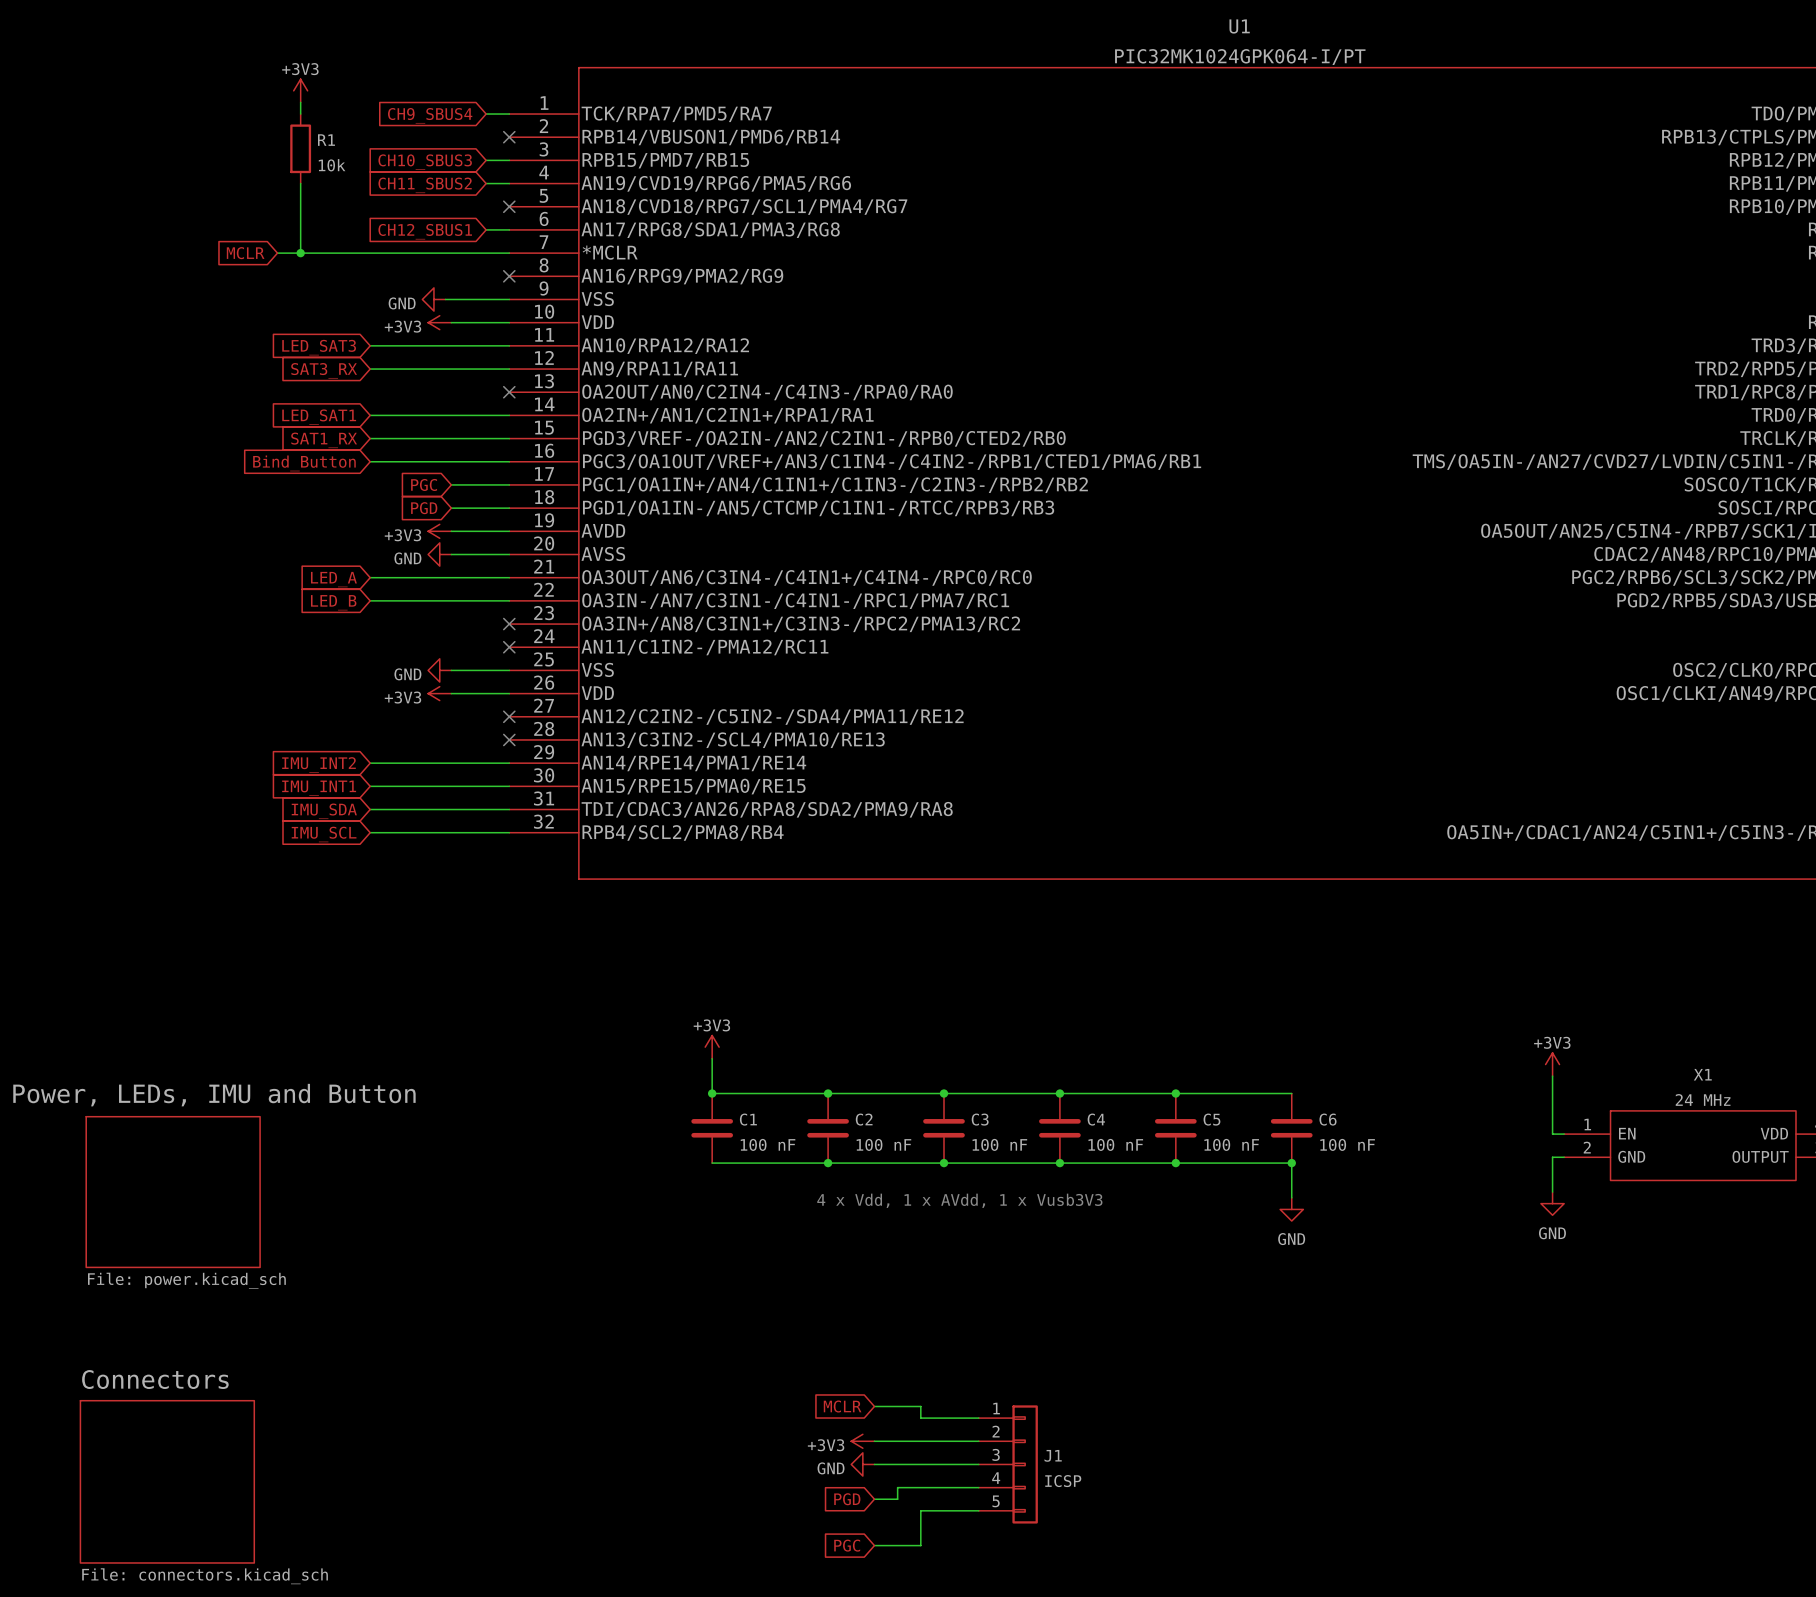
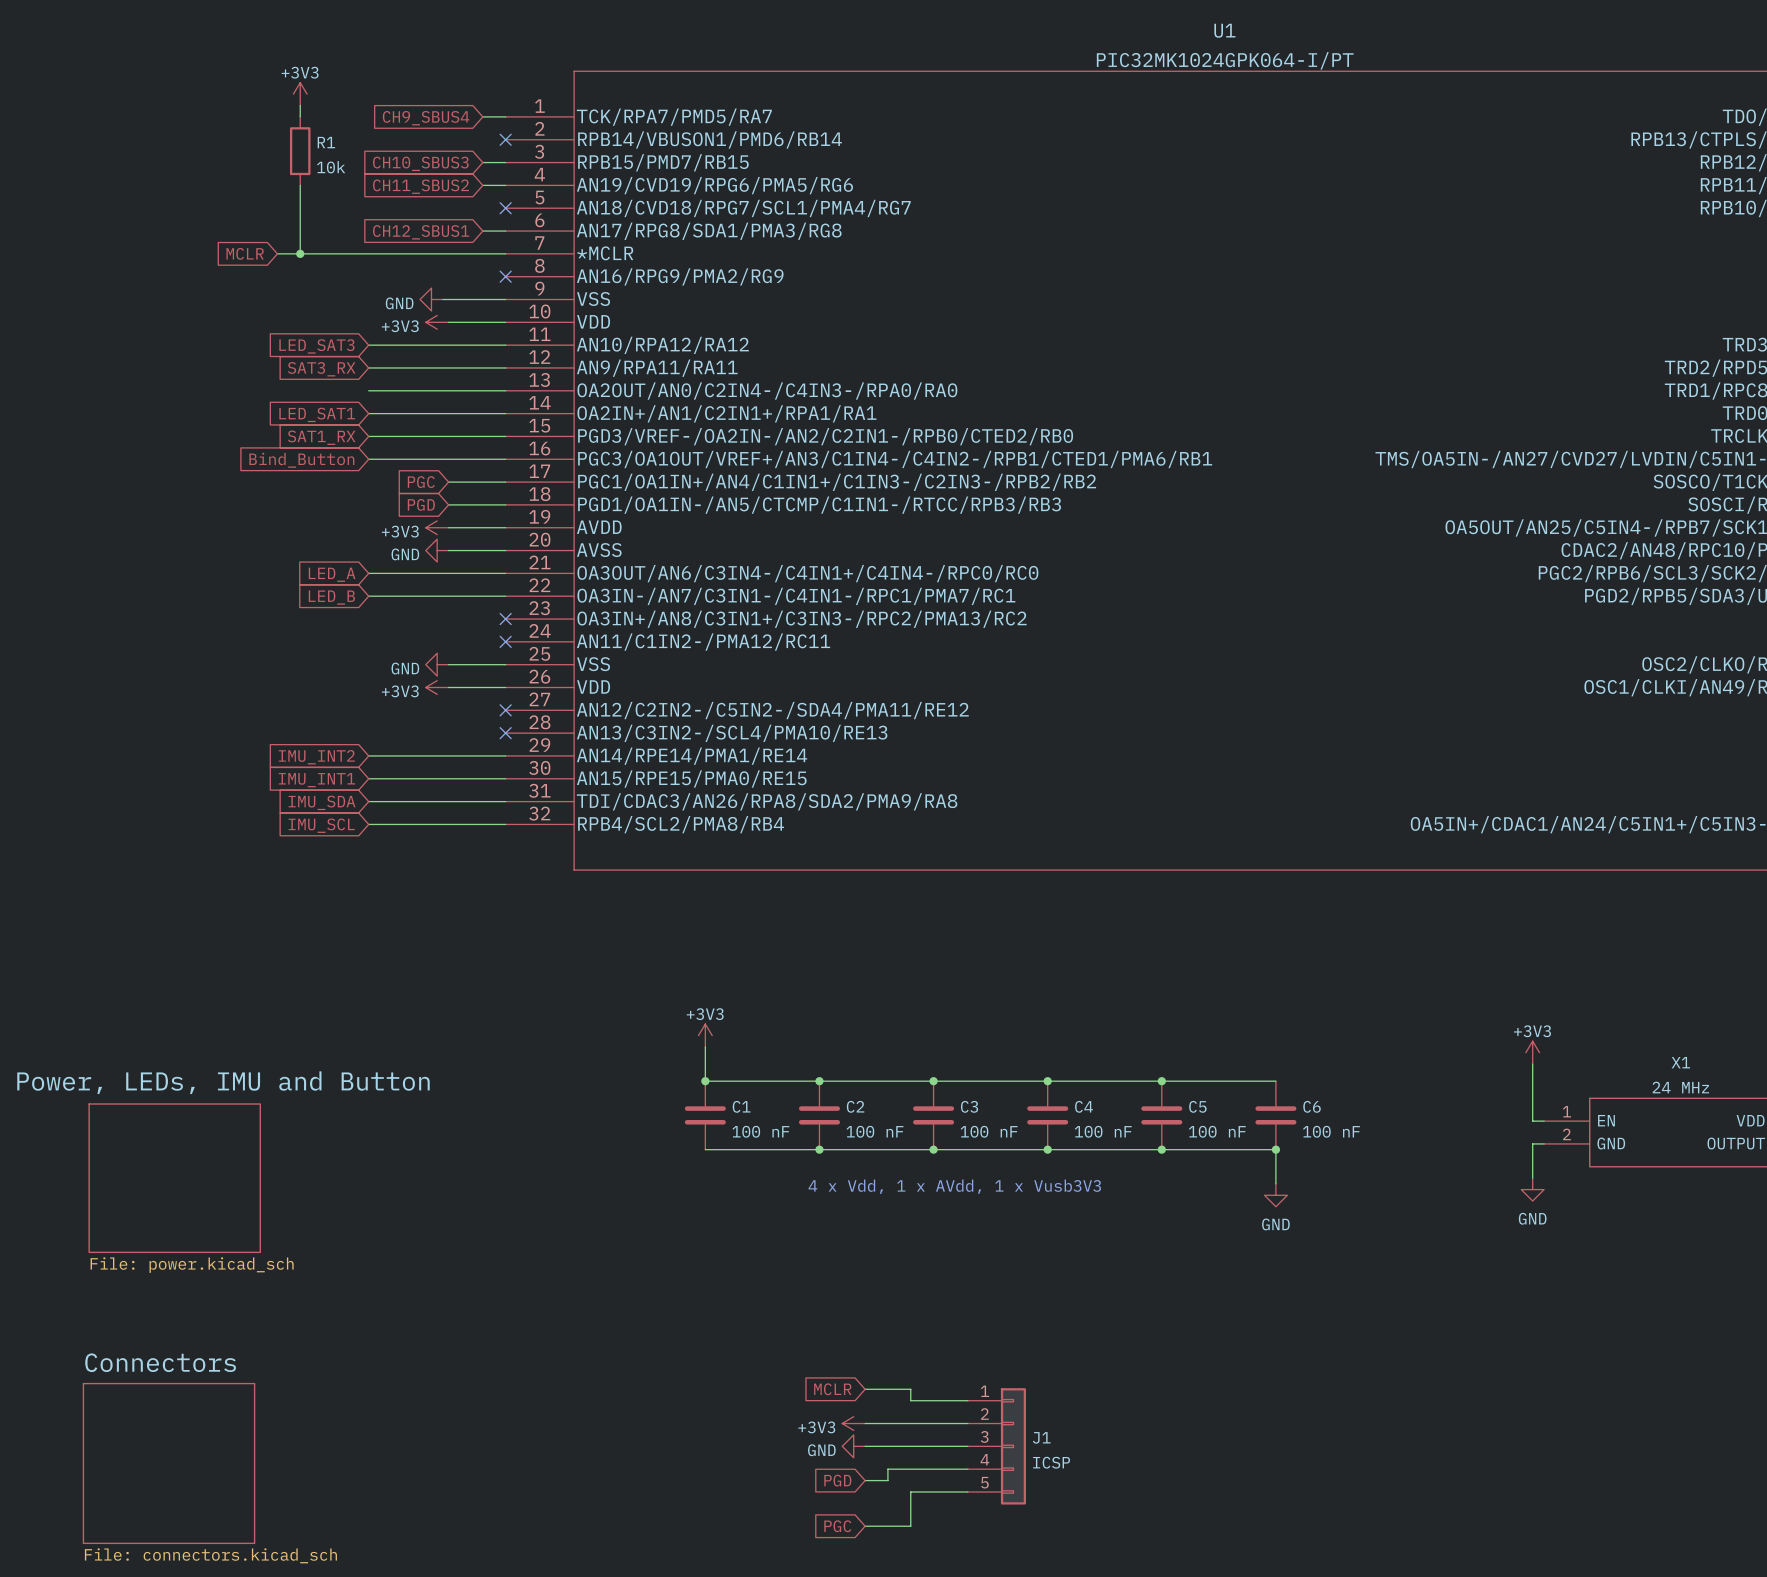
wire: none -> (368, 390) (505, 390)
no-connect mark: (509, 392) -> none

